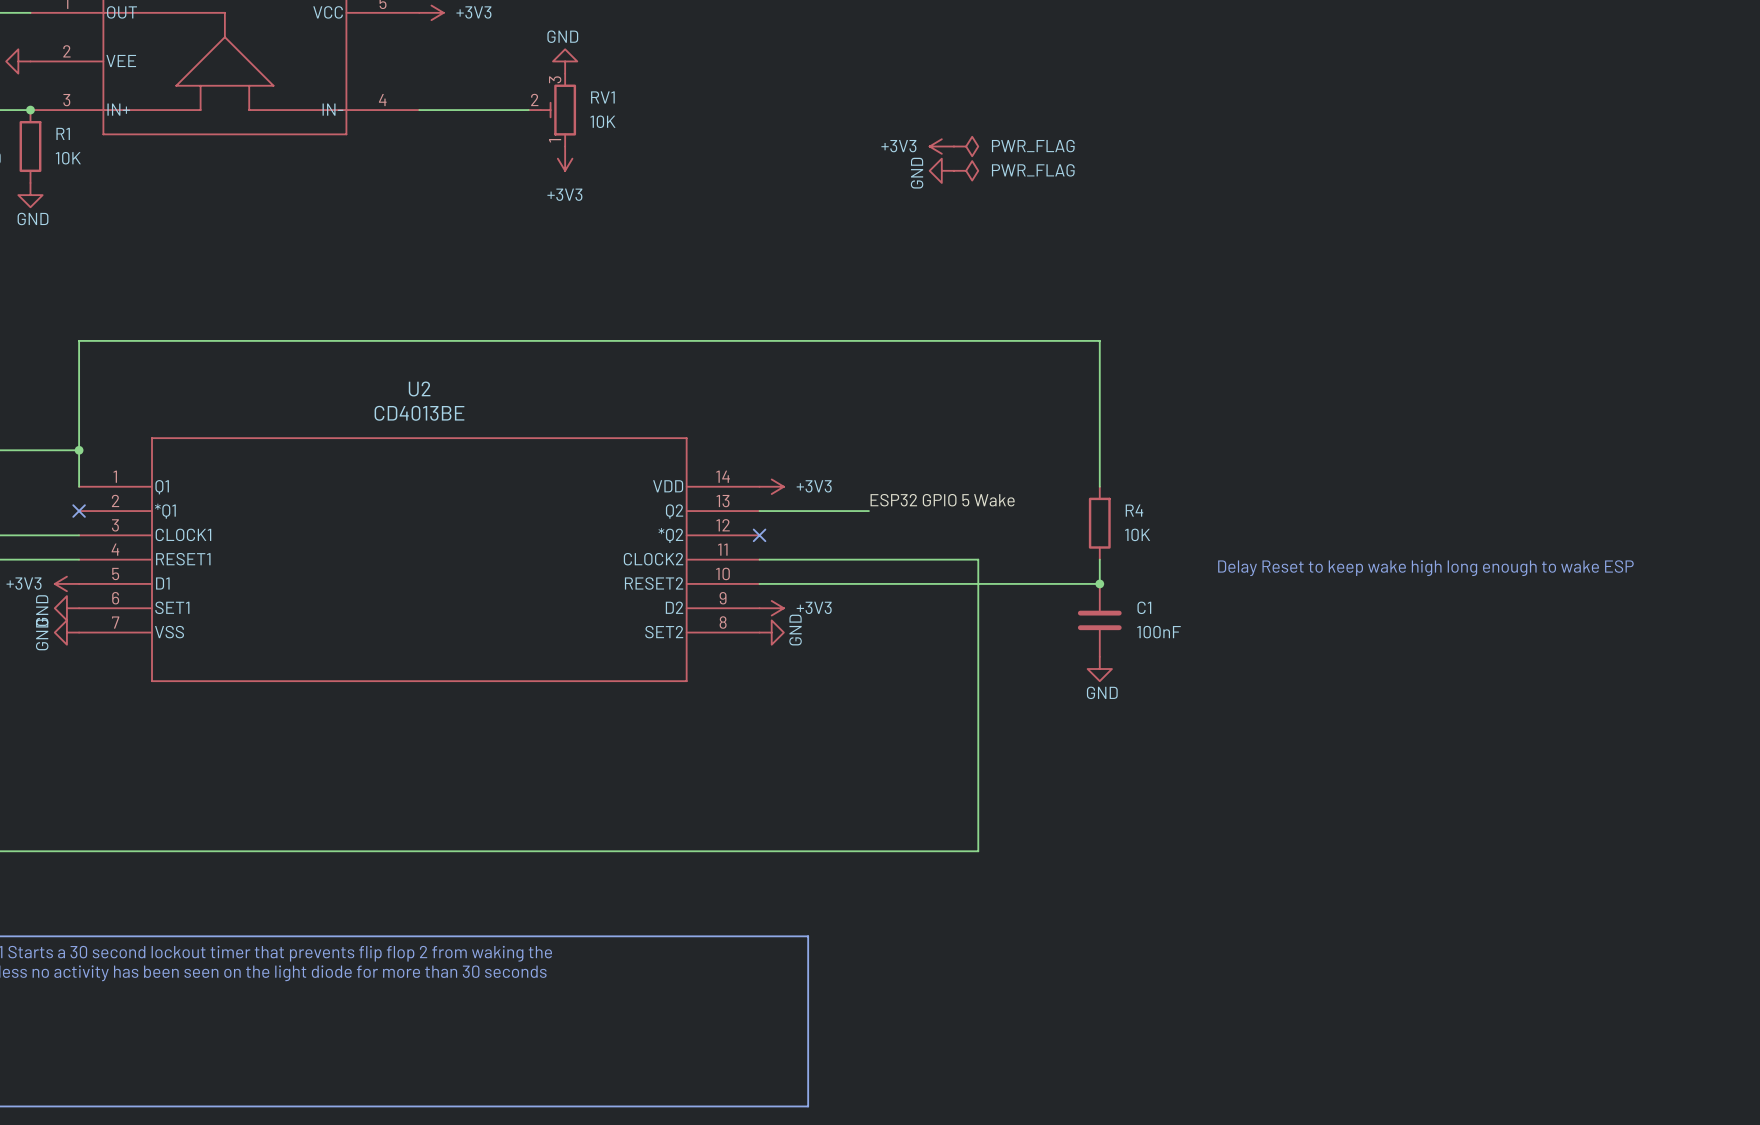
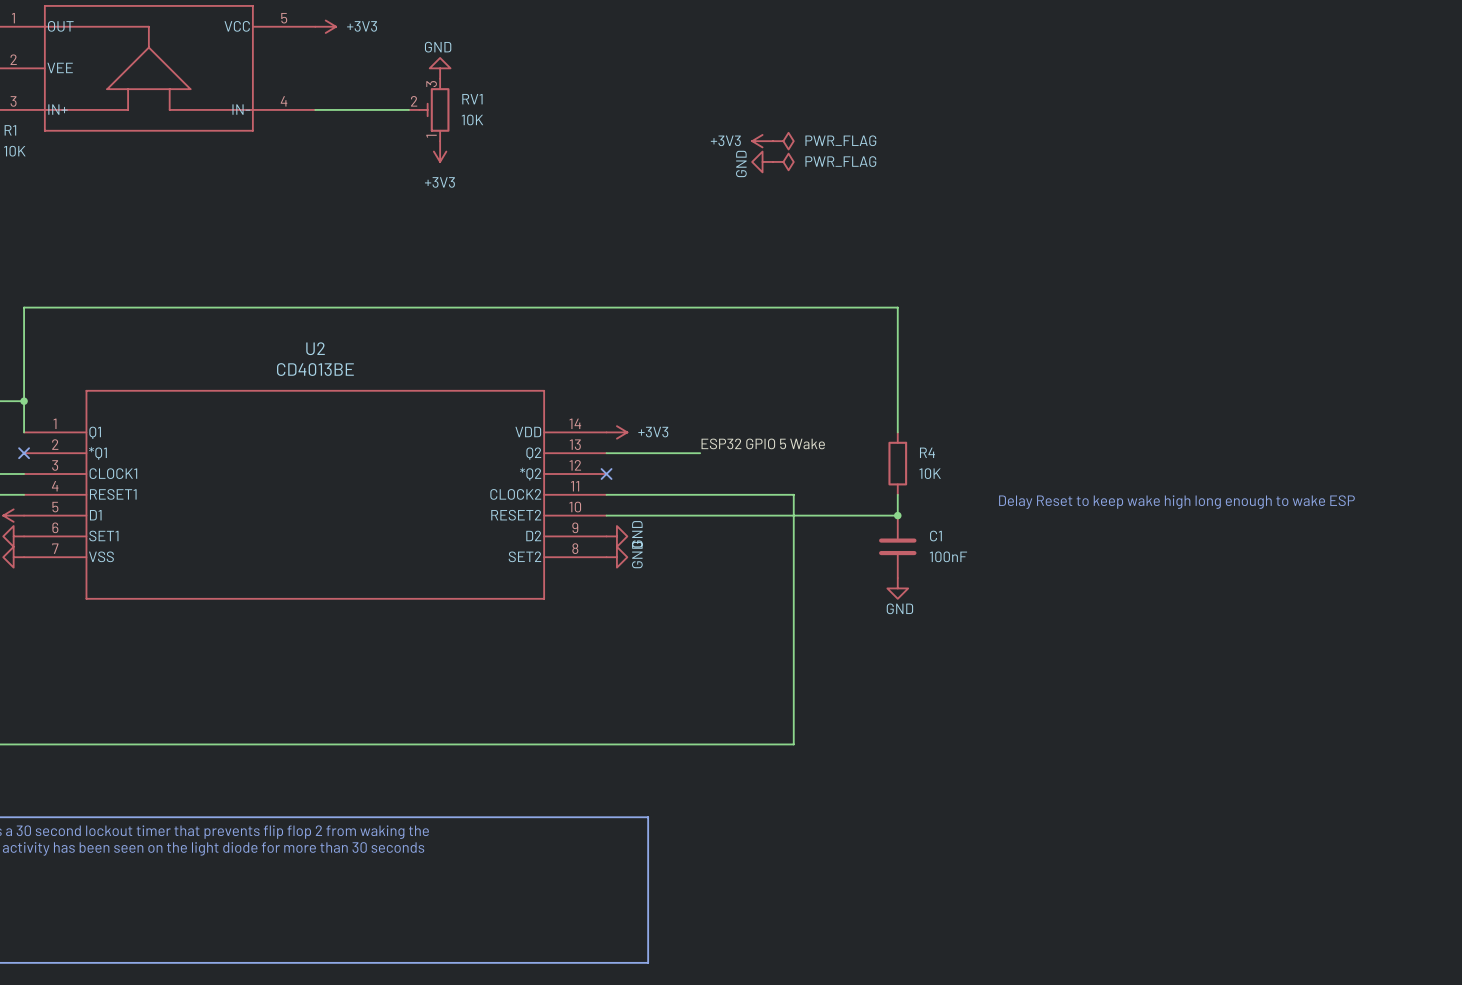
power symbol: +3V3 (771, 608) -> GND (616, 536)

